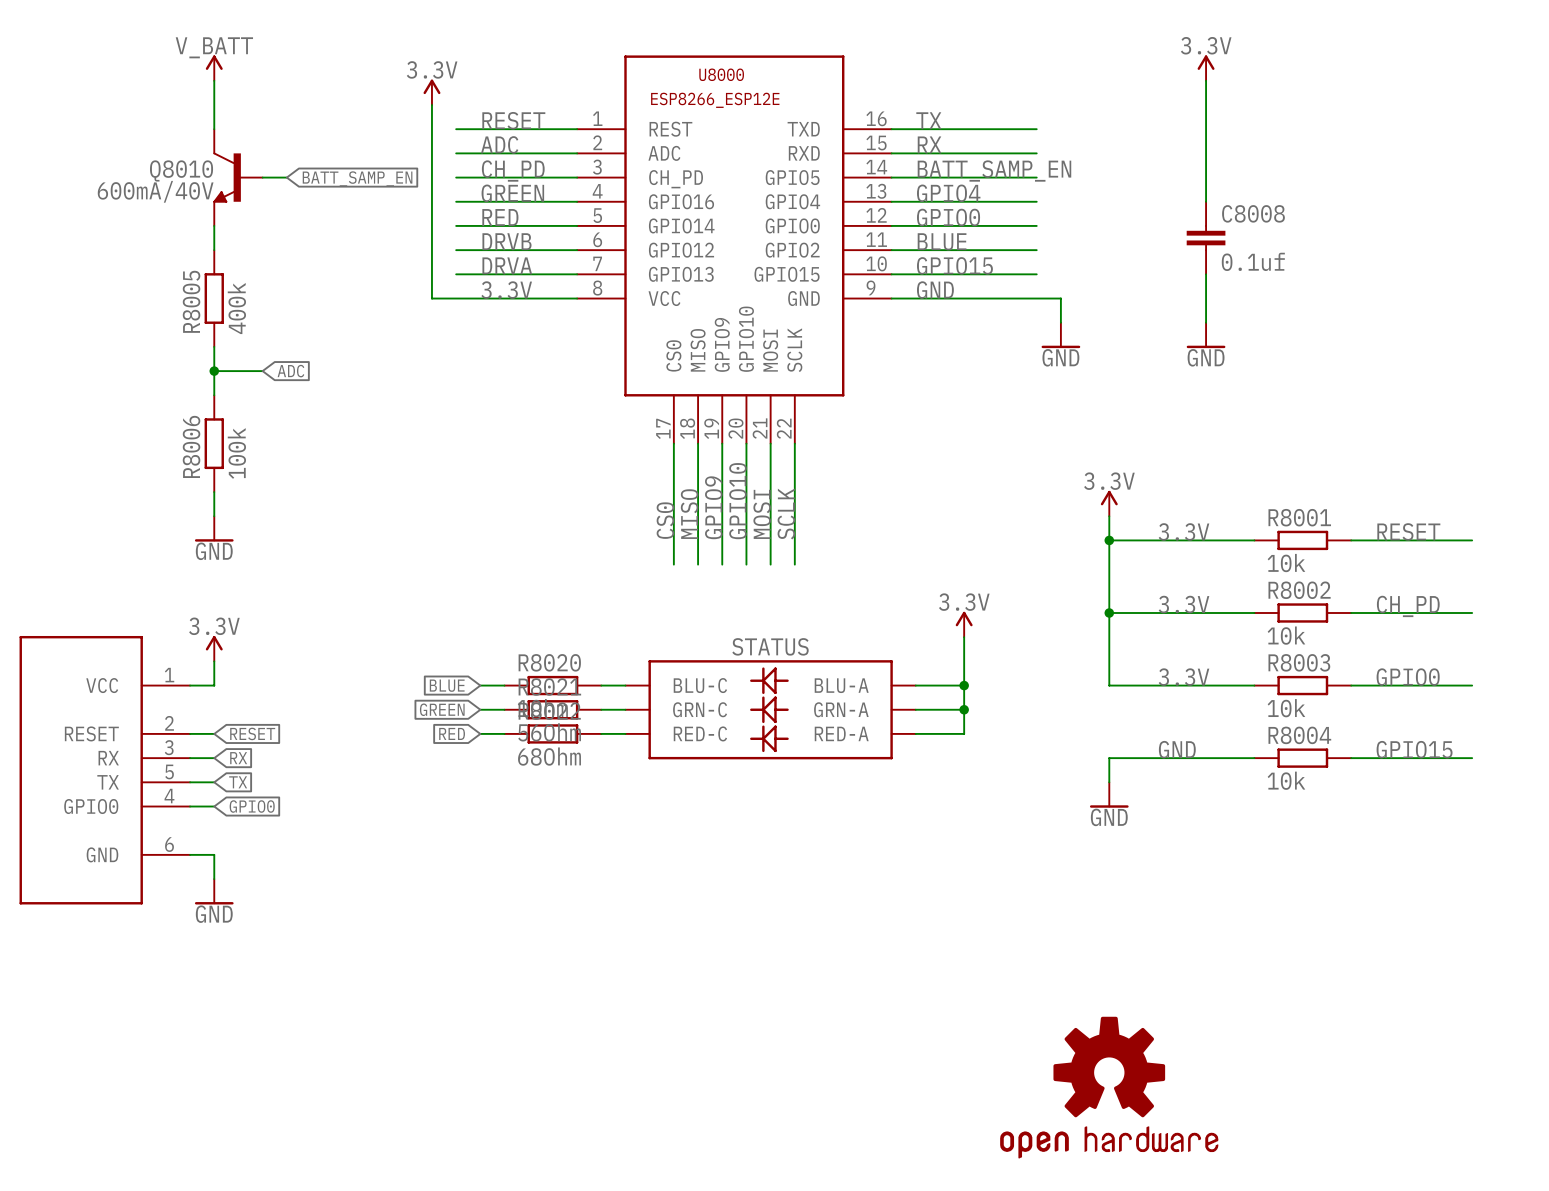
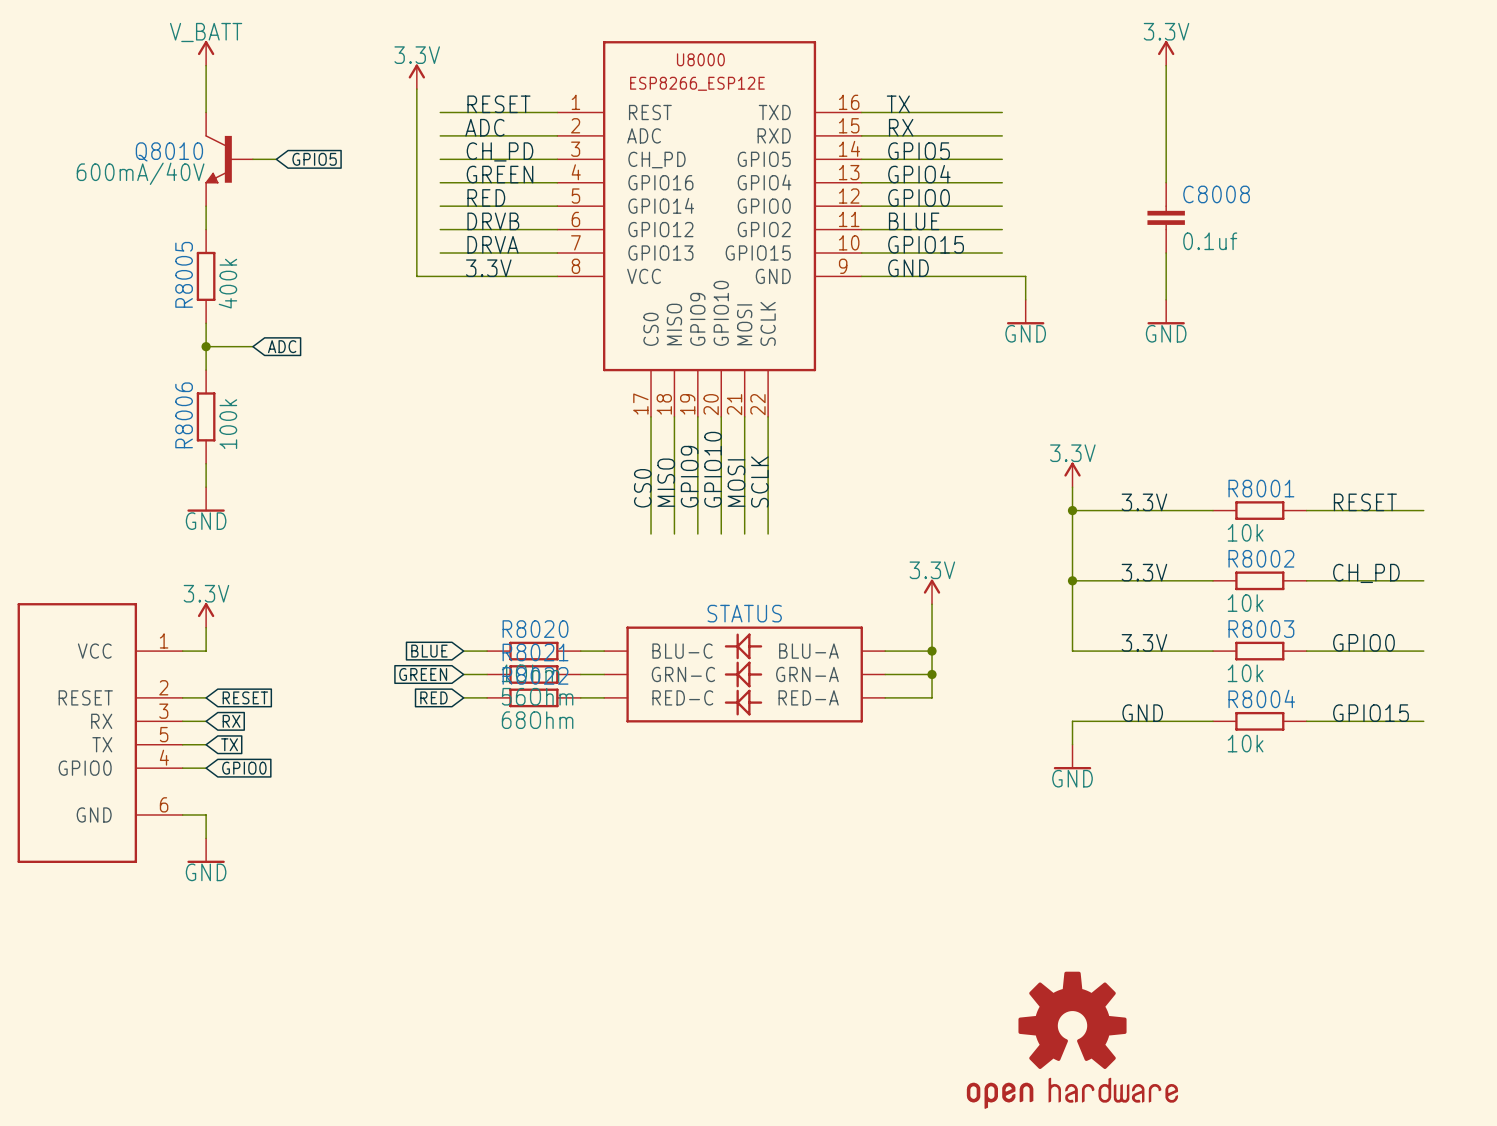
label: BATT_SAMP_EN (994, 171) -> GPIO5 (919, 151)
global label: BATT_SAMP_EN (357, 178) -> GPIO5 (314, 159)

